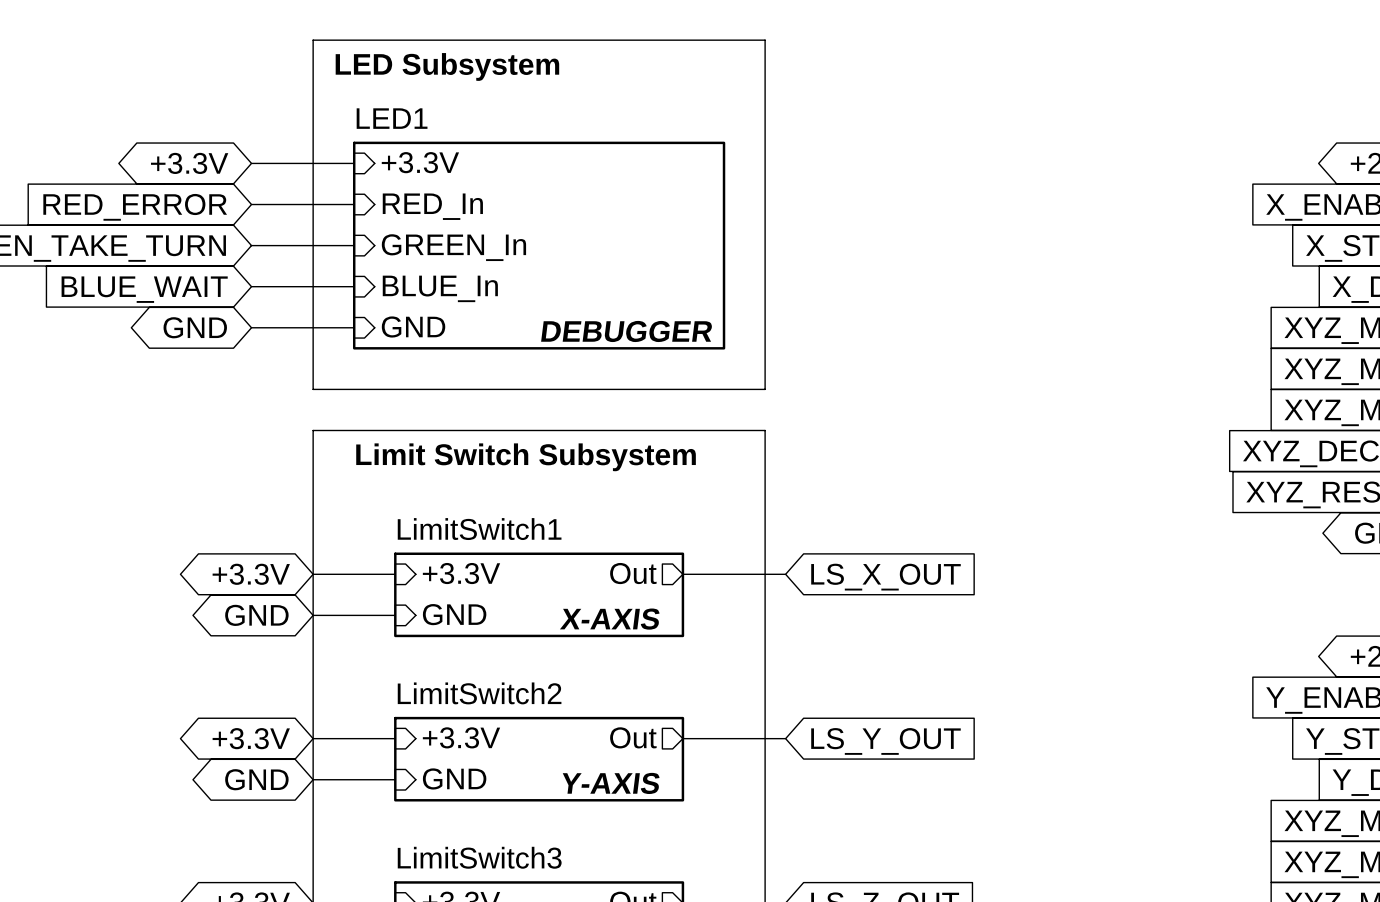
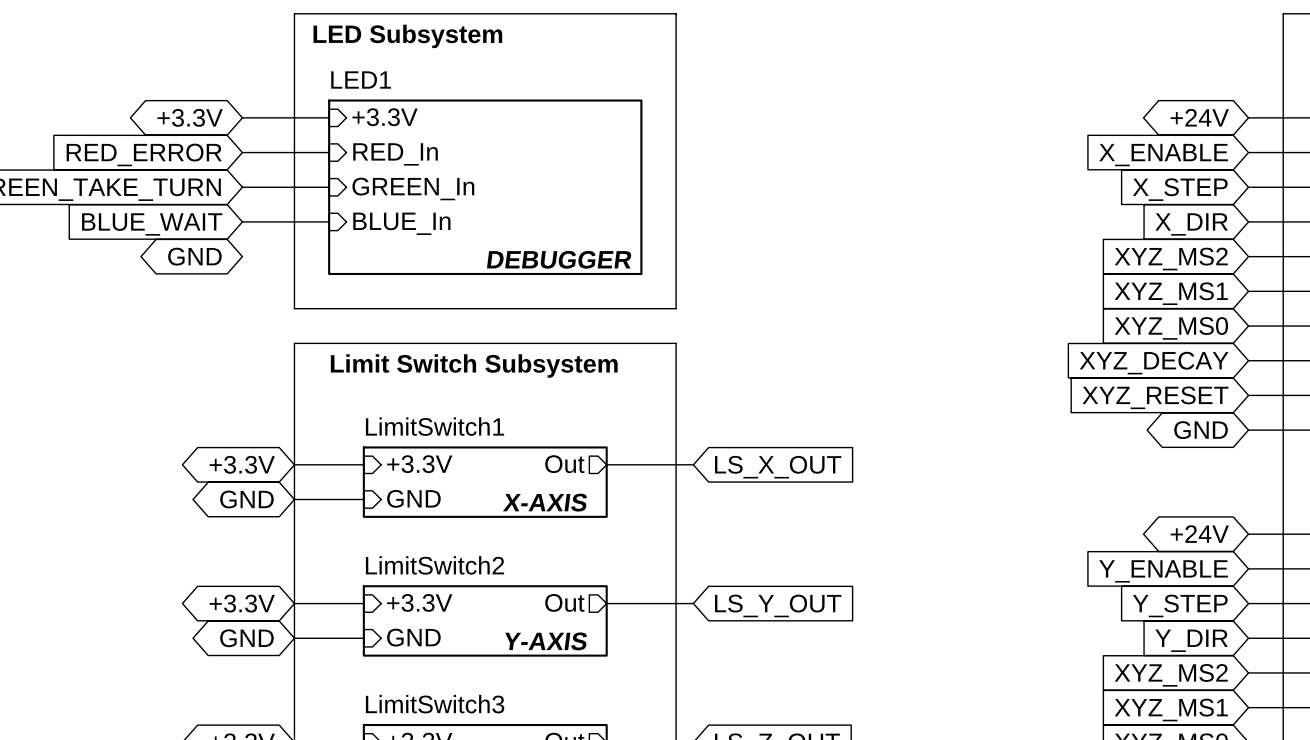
wire: (251, 327) (354, 327) -> none
sheet pin: GND (413, 327) -> none

